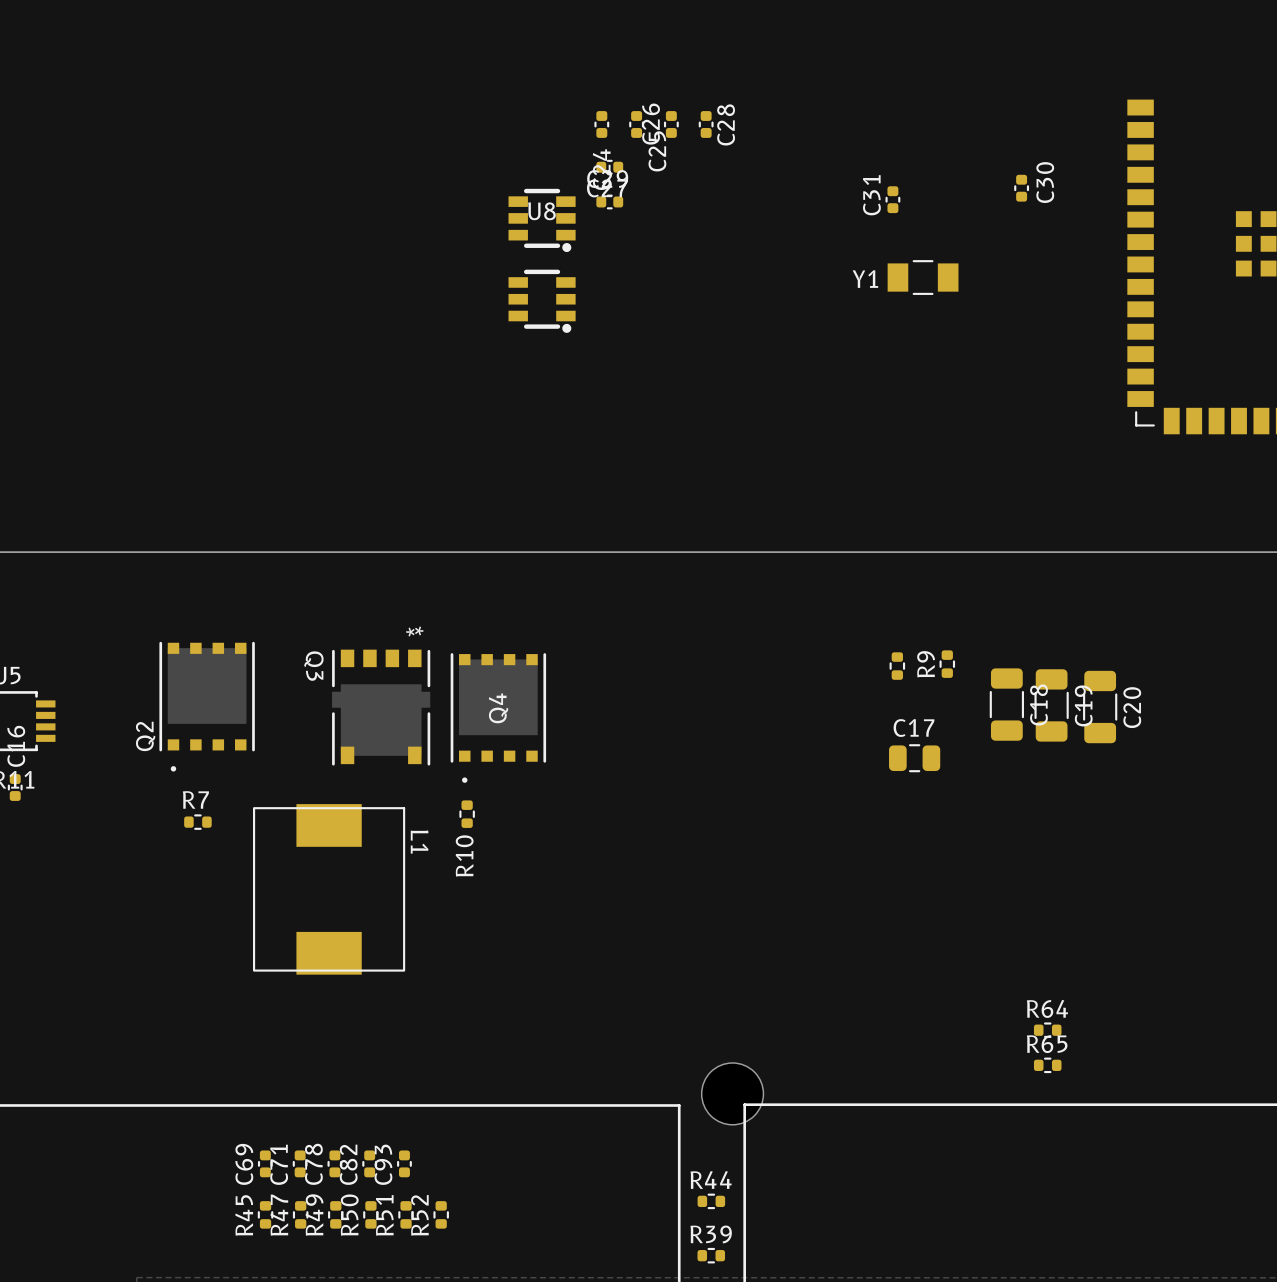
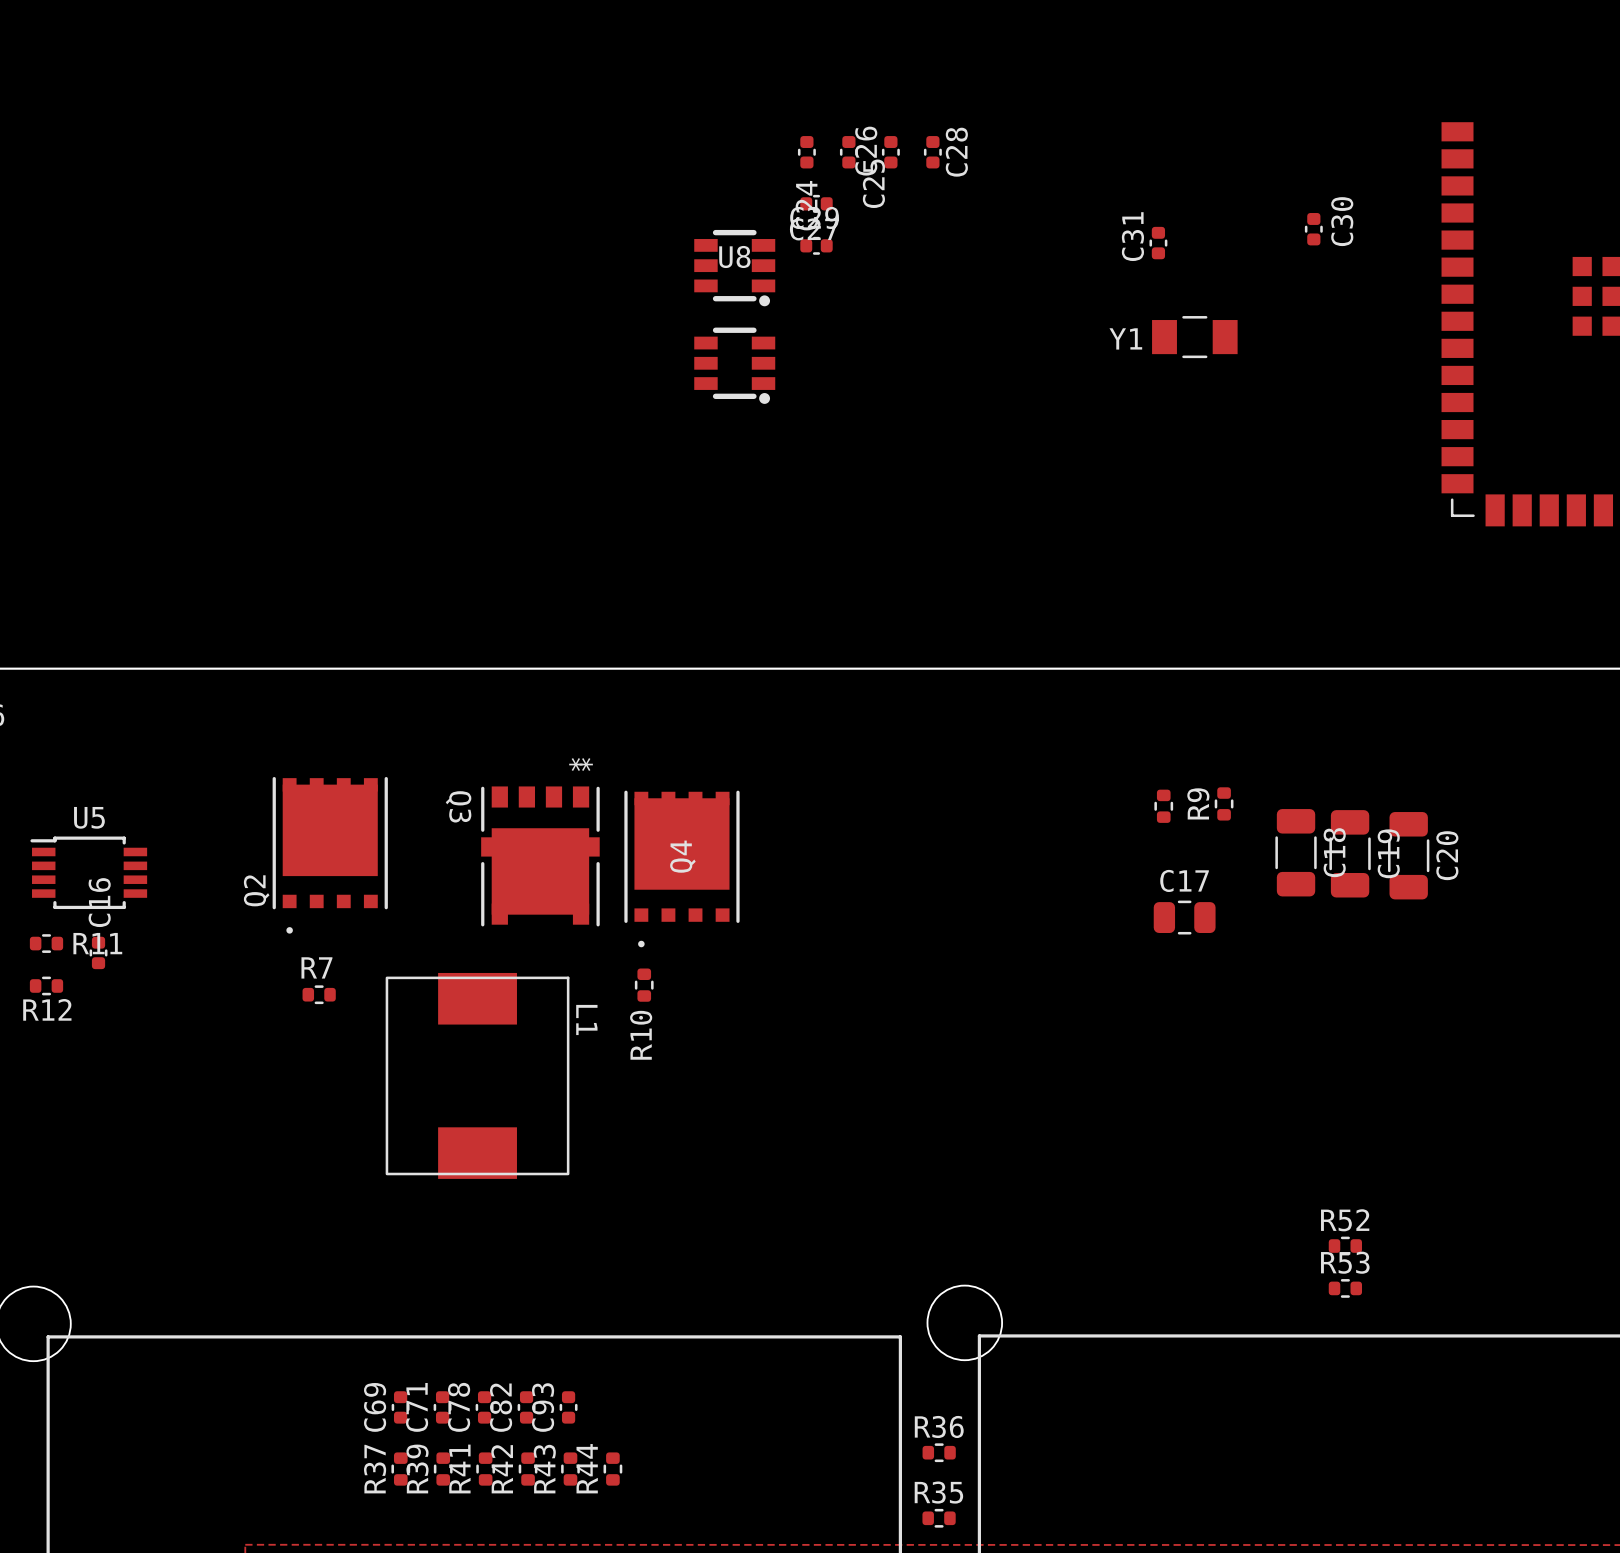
R64 name: R64 (1047, 1008) -> R52 (1345, 1220)
R65 name: R65 (1047, 1044) -> R53 (1345, 1262)
R44 name: R44 (711, 1180) -> R36 (939, 1426)
R45 name: R45 (244, 1215) -> R37 (375, 1469)
R47 name: R47 (279, 1215) -> R39 (417, 1469)
R49 name: R49 (314, 1215) -> R41 (459, 1469)
R50 name: R50 (349, 1215) -> R42 (502, 1469)
R51 name: R51 (384, 1215) -> R43 (544, 1469)
R52 name: R52 (419, 1215) -> R44 (587, 1468)
R39 name: R39 (711, 1234) -> R35 (938, 1492)

